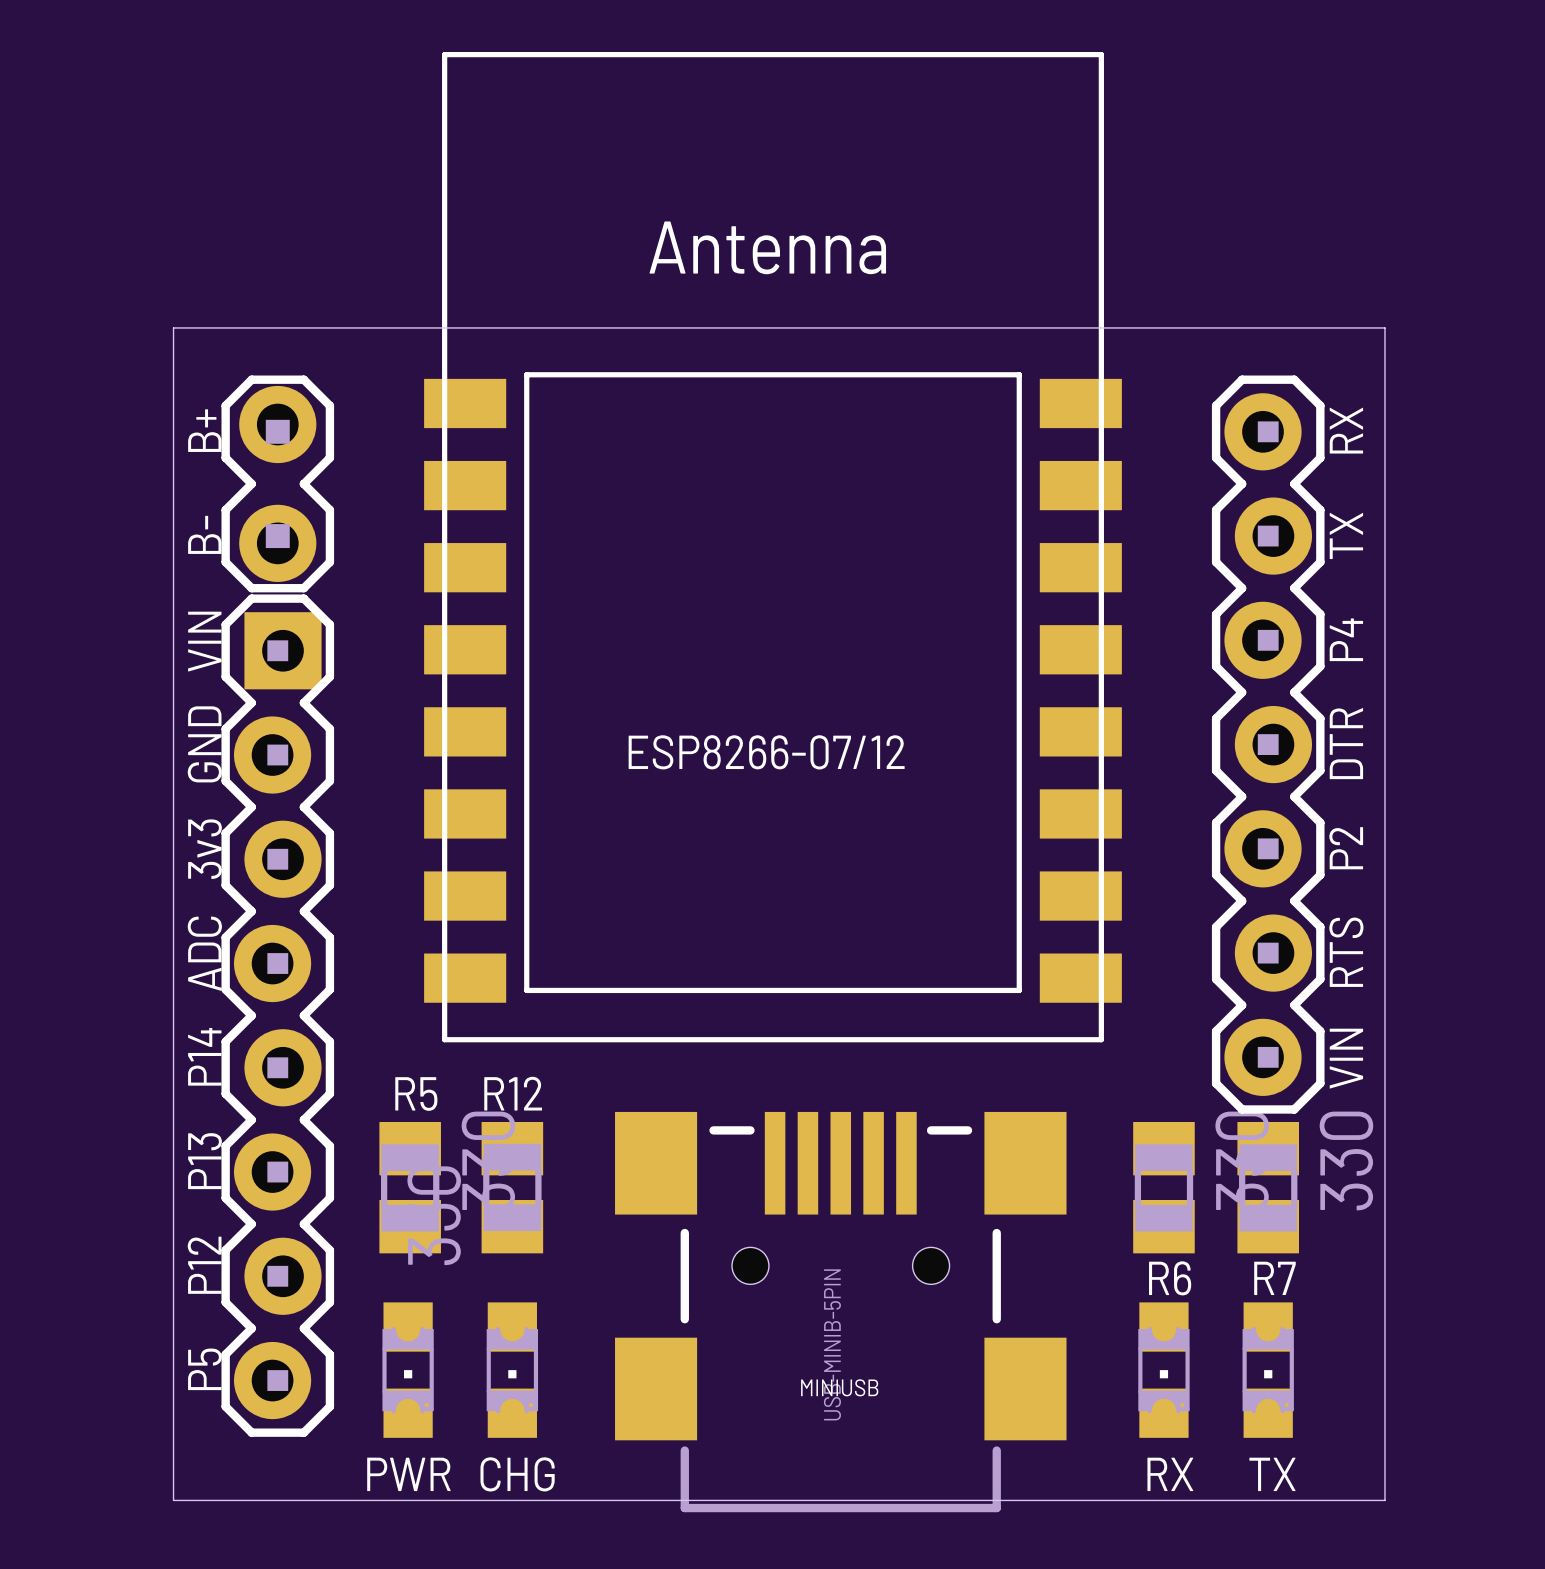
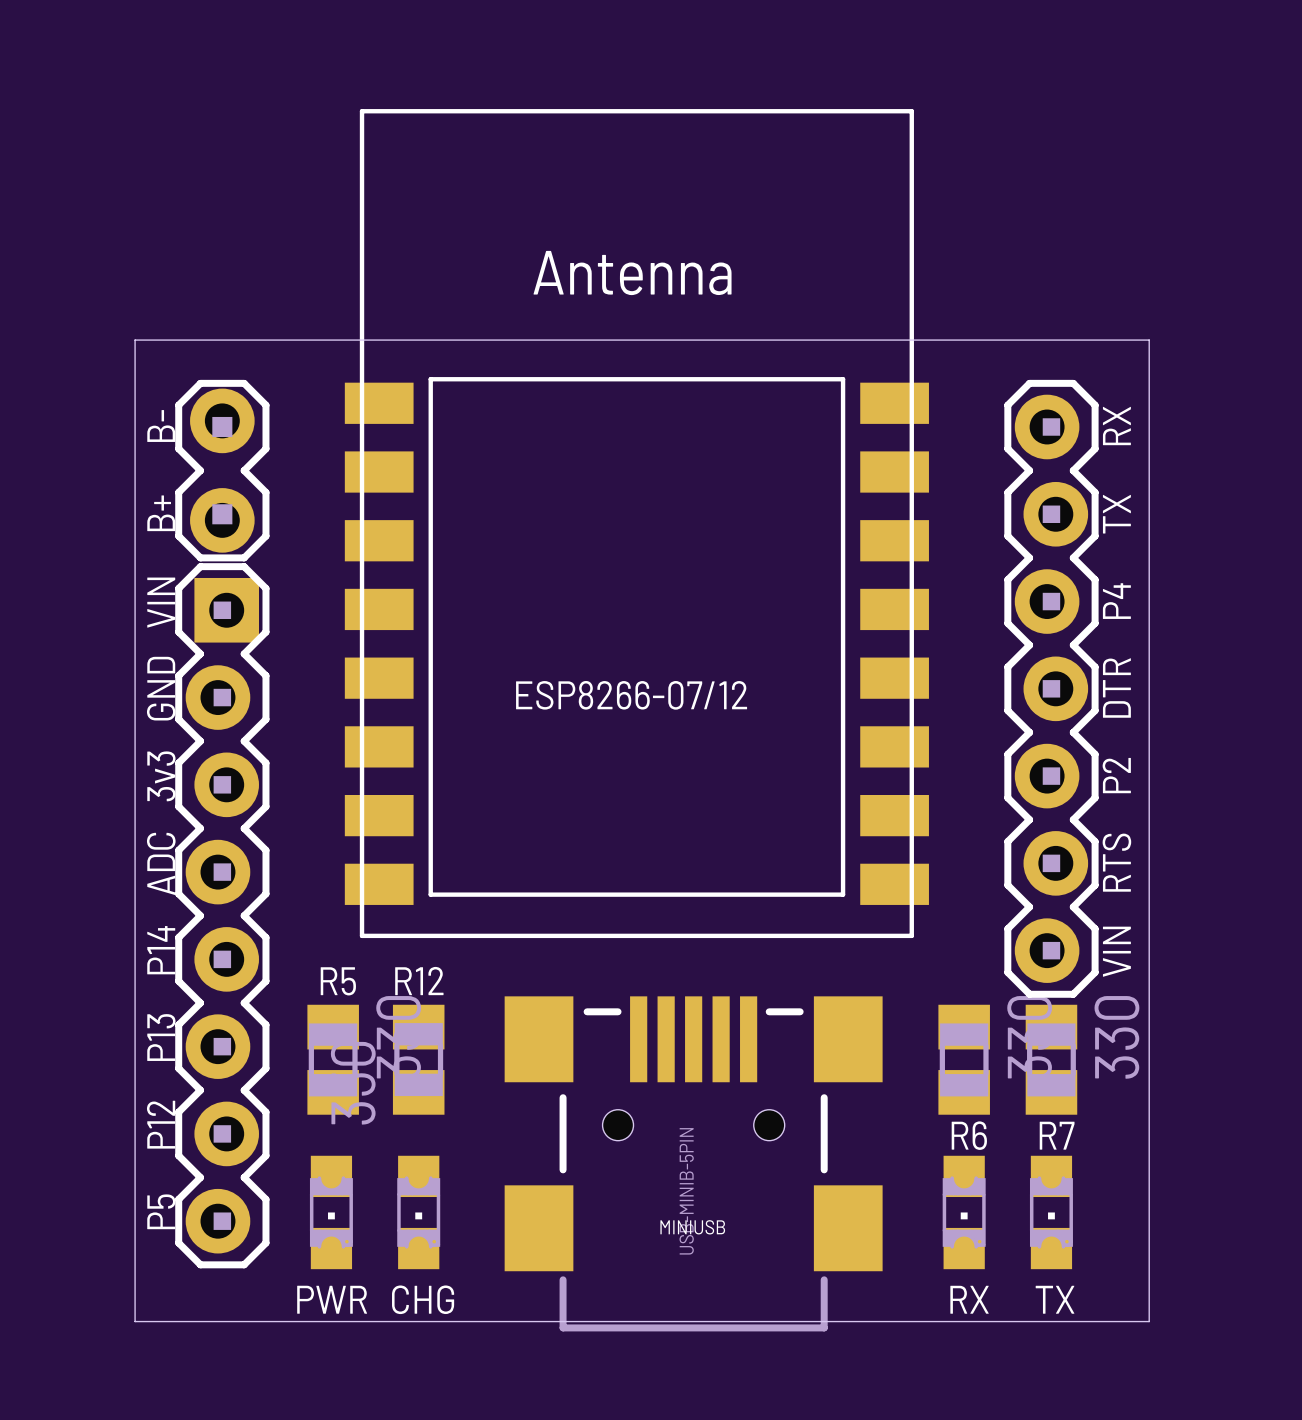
text: B+ (204, 430) -> B- (161, 426)
text: B- (204, 534) -> B+ (161, 513)

